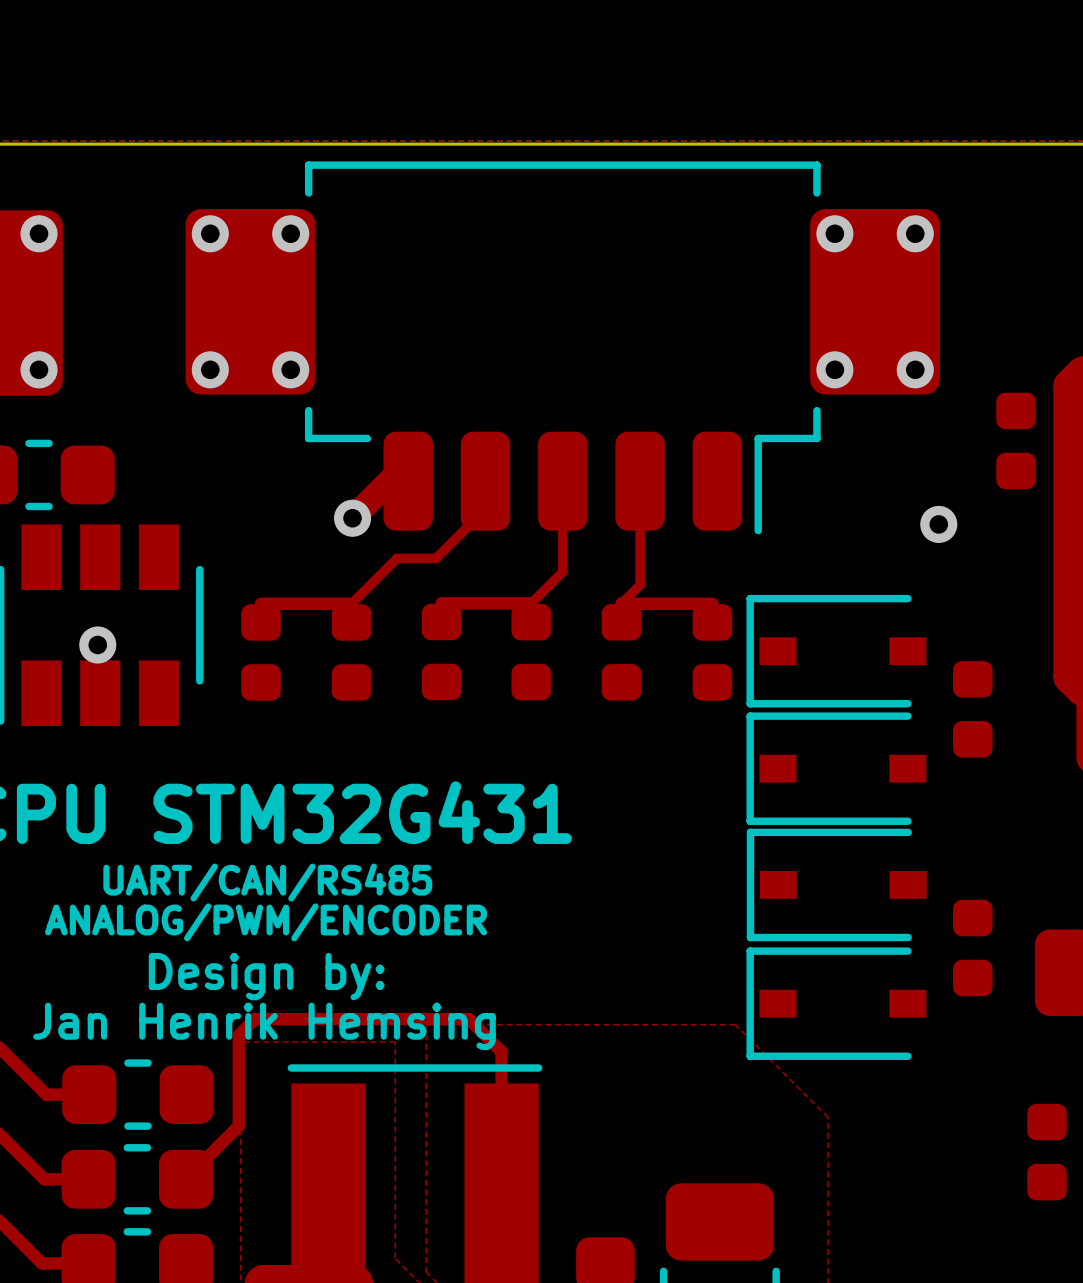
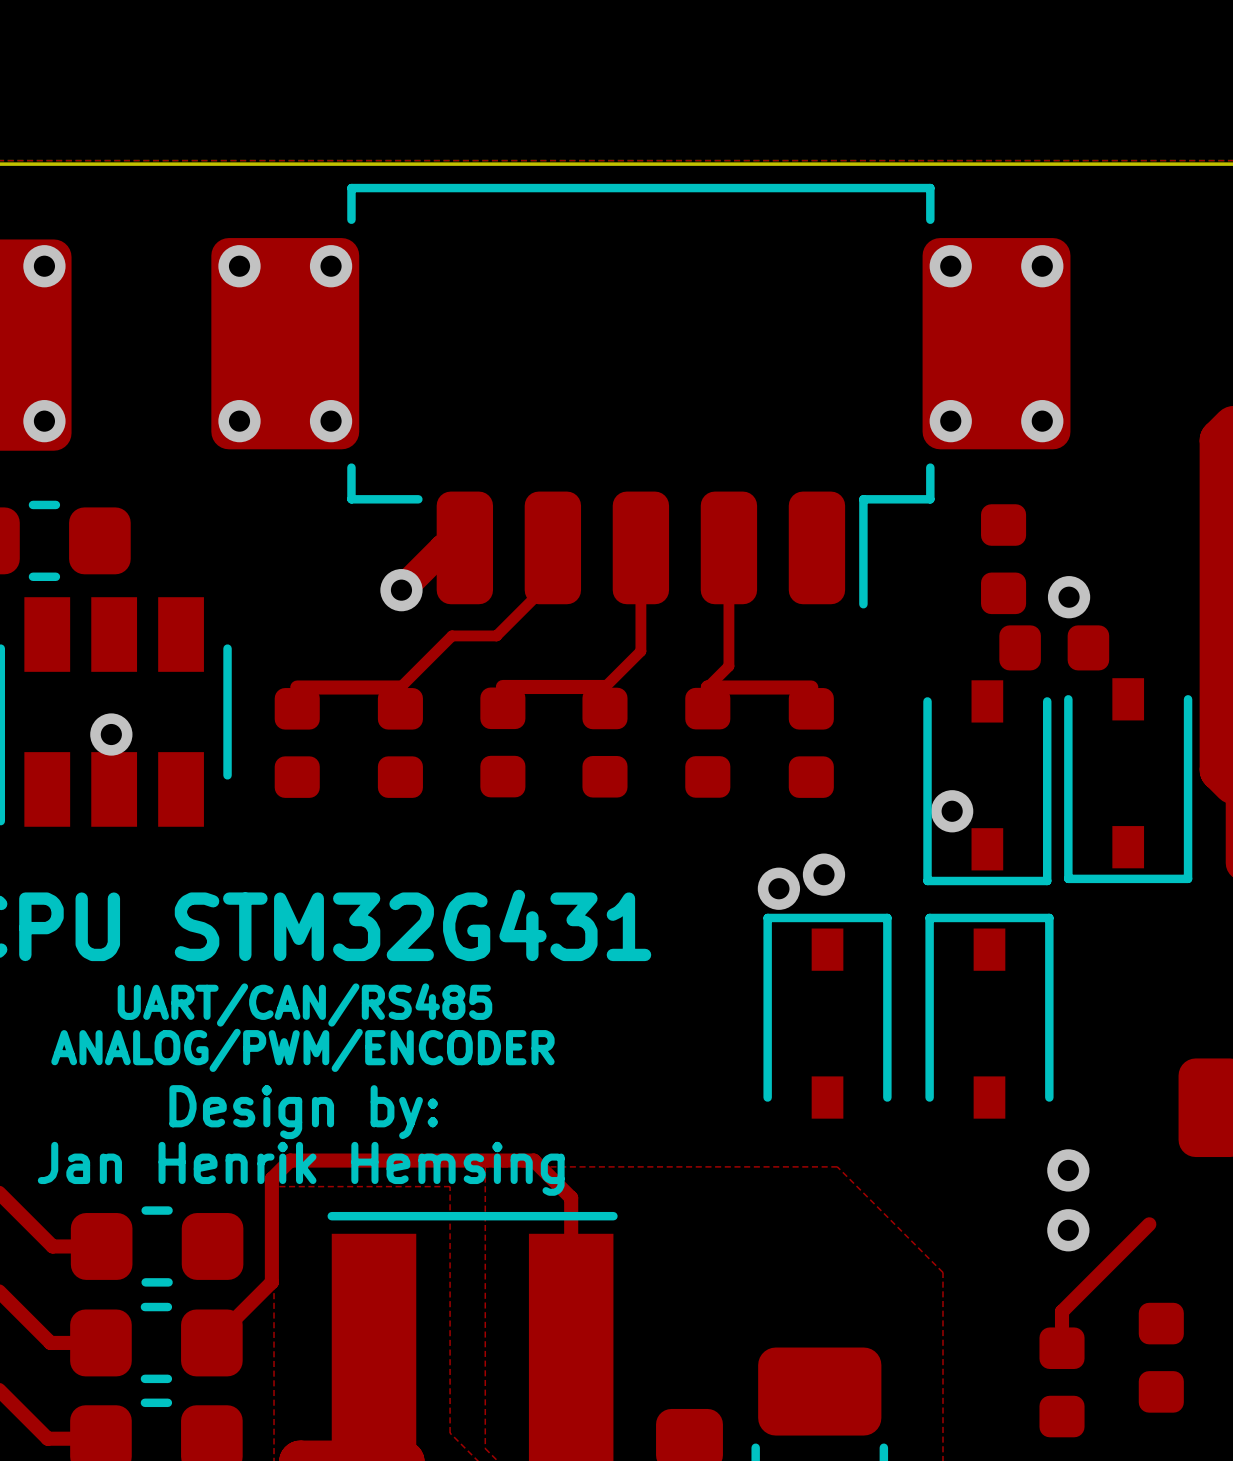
part: (1016, 440) -> none
part: none -> (1003, 559)
part: none -> (1054, 647)
part: (836, 651) -> none
part footprint: [953, 661, 993, 758] -> [1064, 678, 1193, 884]
part: none -> (987, 782)
via: none -> (952, 811)
via: none -> (823, 874)
part: (836, 768) -> none
via: none -> (778, 888)
part rotation: 0° (836, 884) -> 90° clockwise (989, 1016)
part: none -> (827, 1016)
part: (972, 948) -> none
part: (836, 1003) -> none
via: none -> (1068, 1170)
top track: none -> (1149, 1224) (1062, 1311) (1062, 1326)
via: none -> (1068, 1230)
part position: (1047, 1152) -> (1161, 1357)
part: none -> (1062, 1382)

